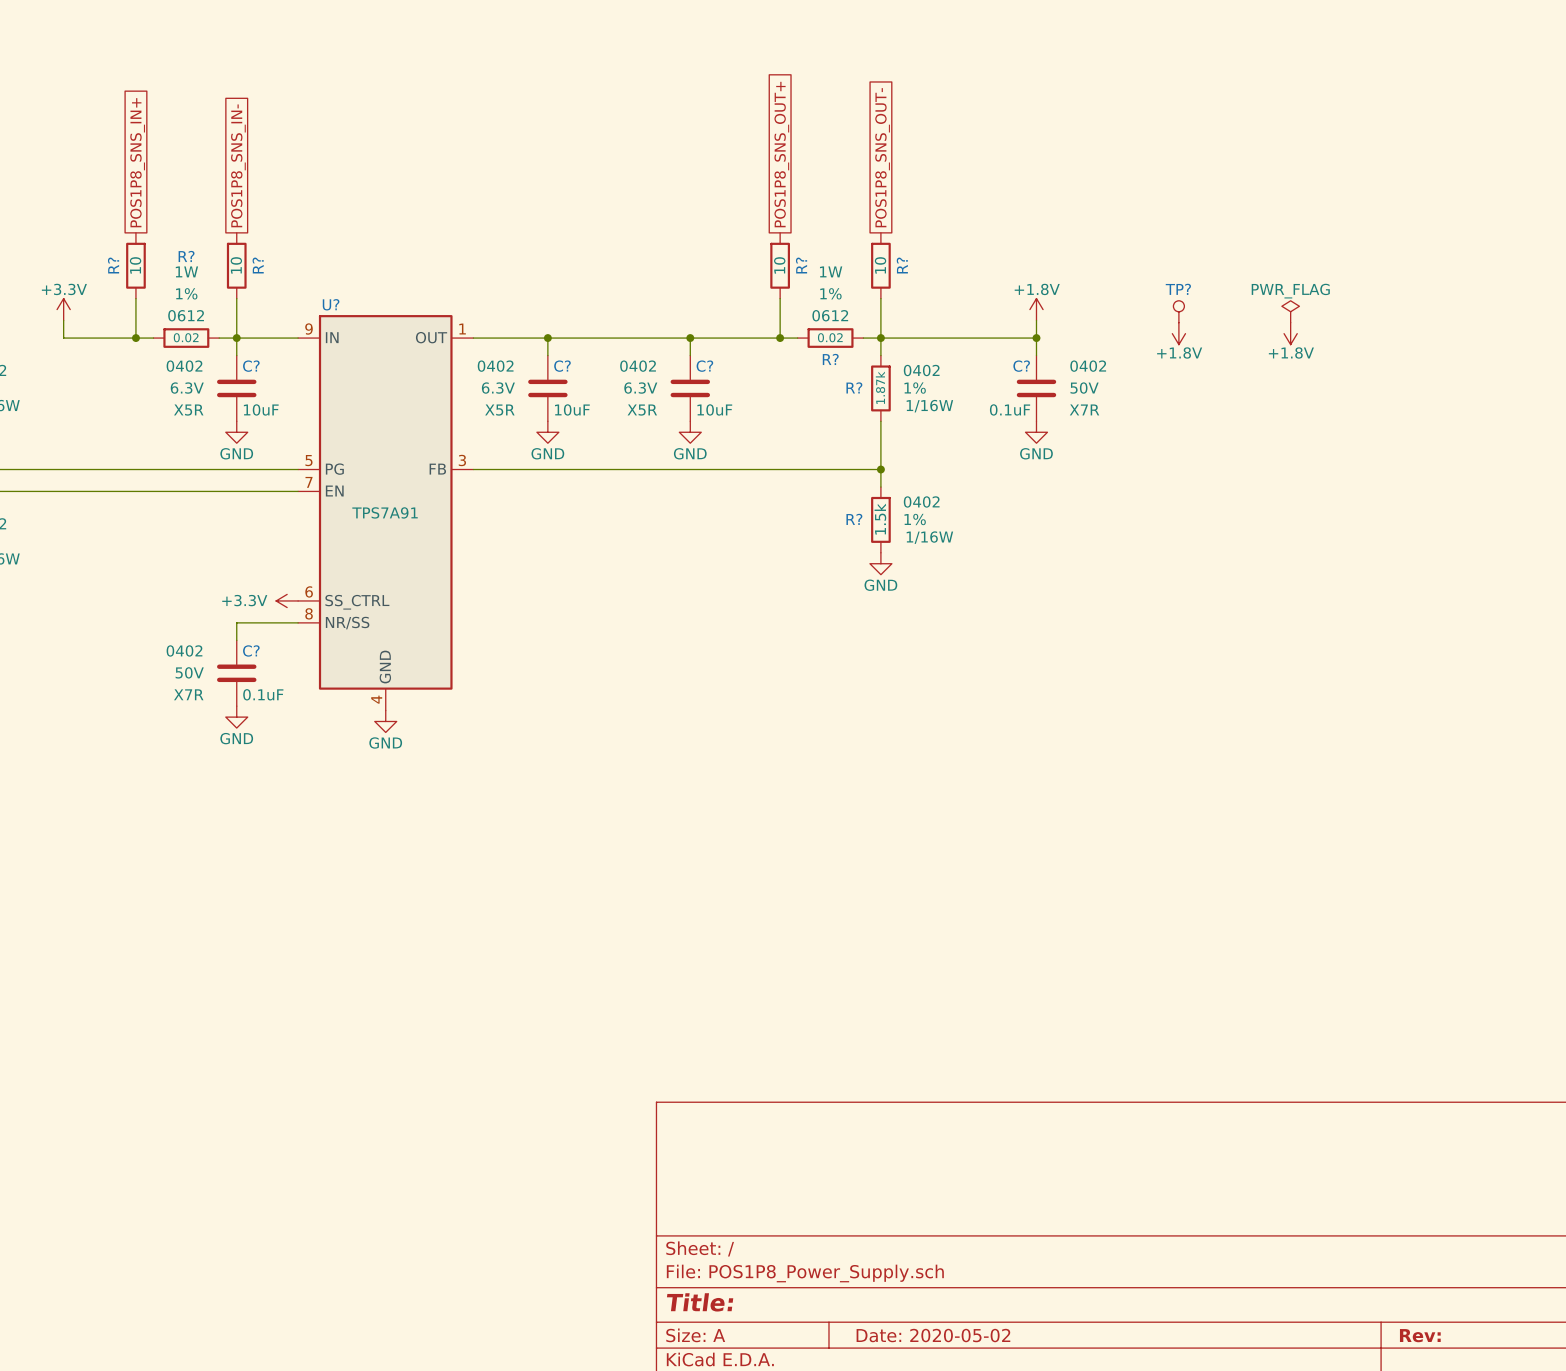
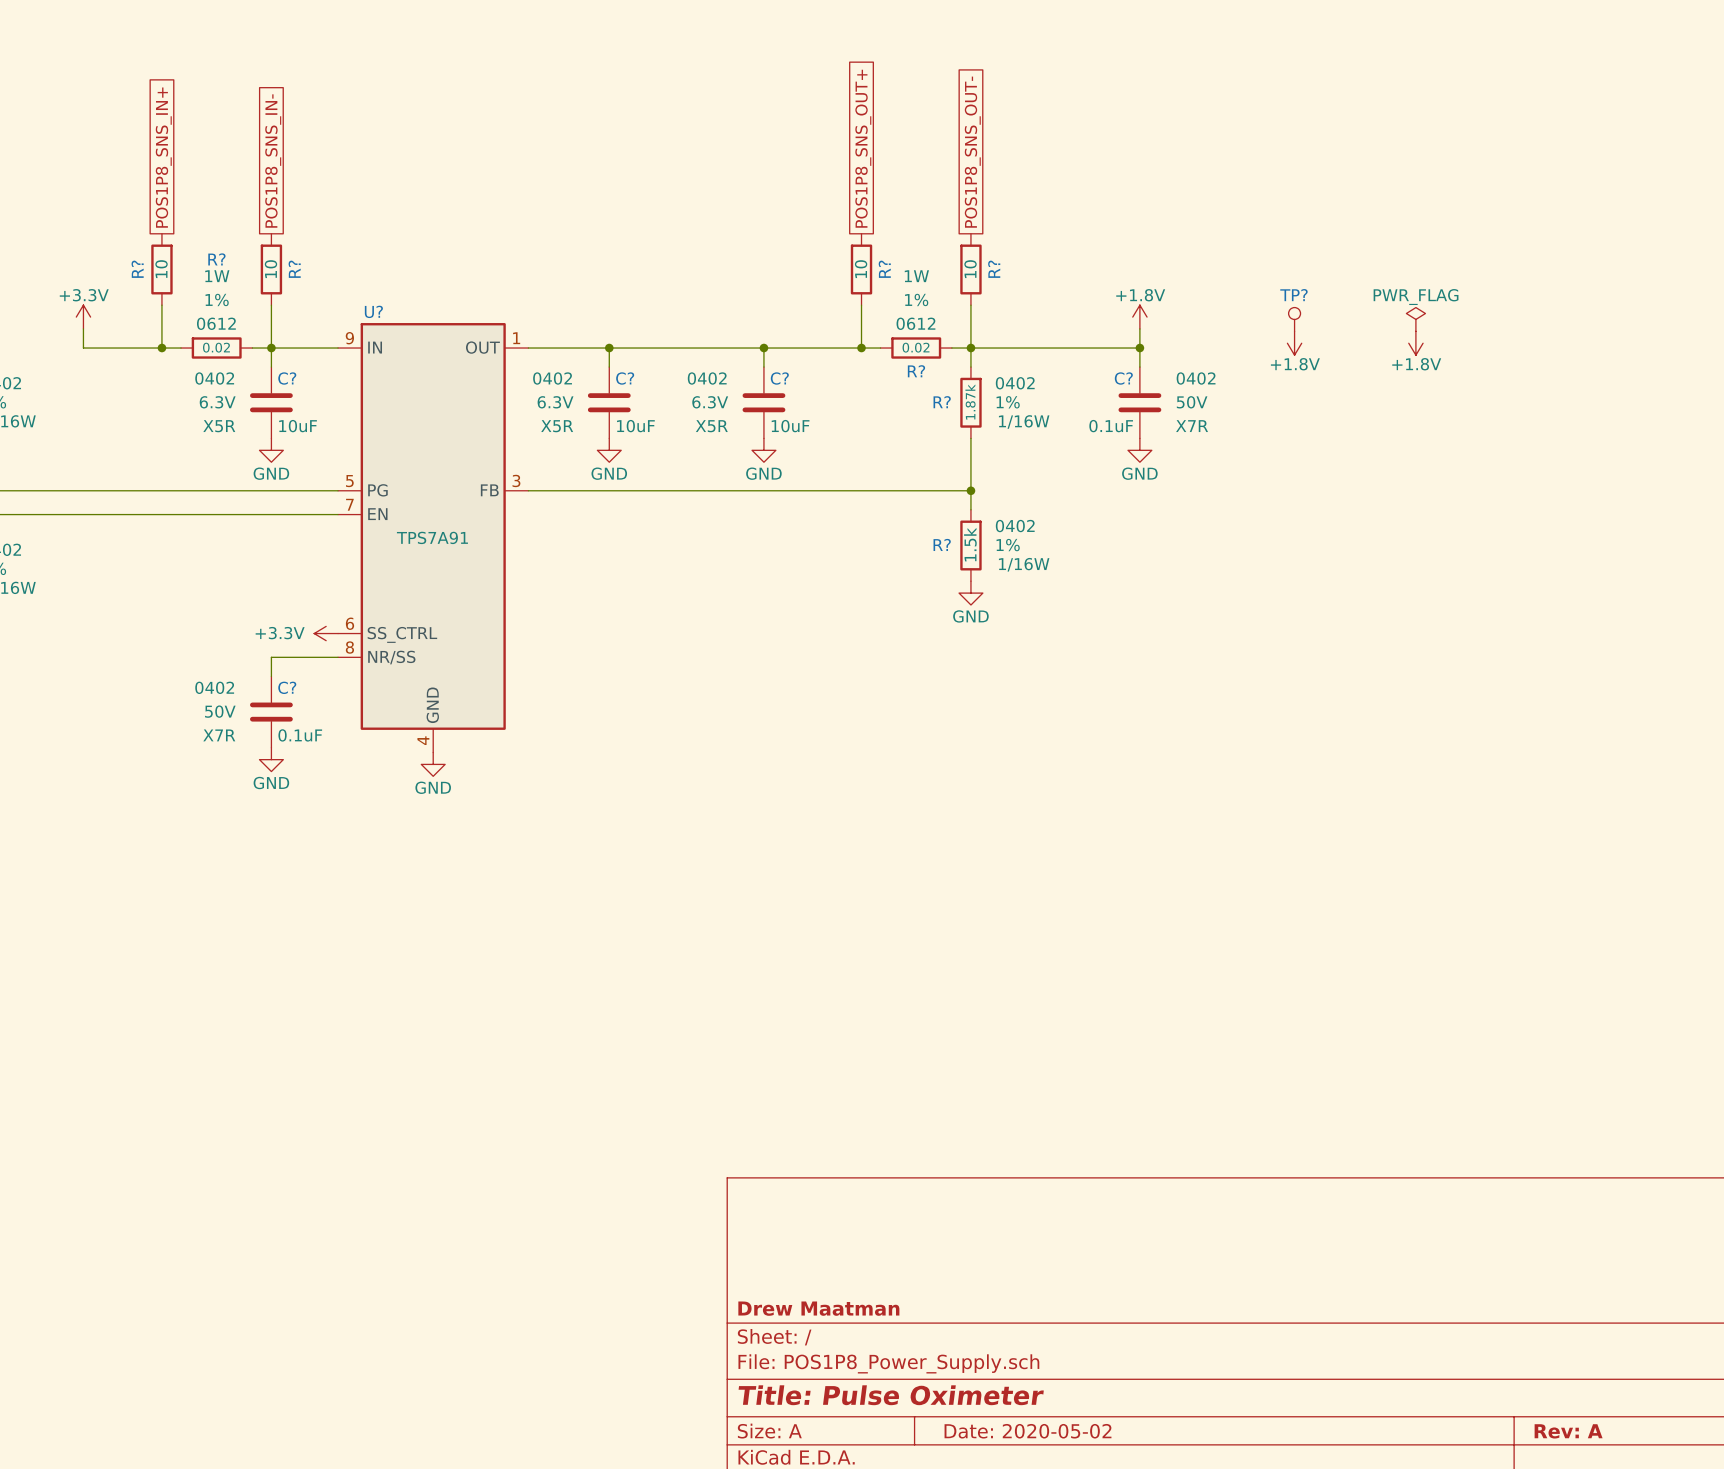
title block: none -> Drew Maatman (818, 1308)
title block: Title: (700, 1302) -> Title: Pulse Oximeter (891, 1395)
title block: Rev: (1420, 1335) -> Rev: A (1568, 1431)

